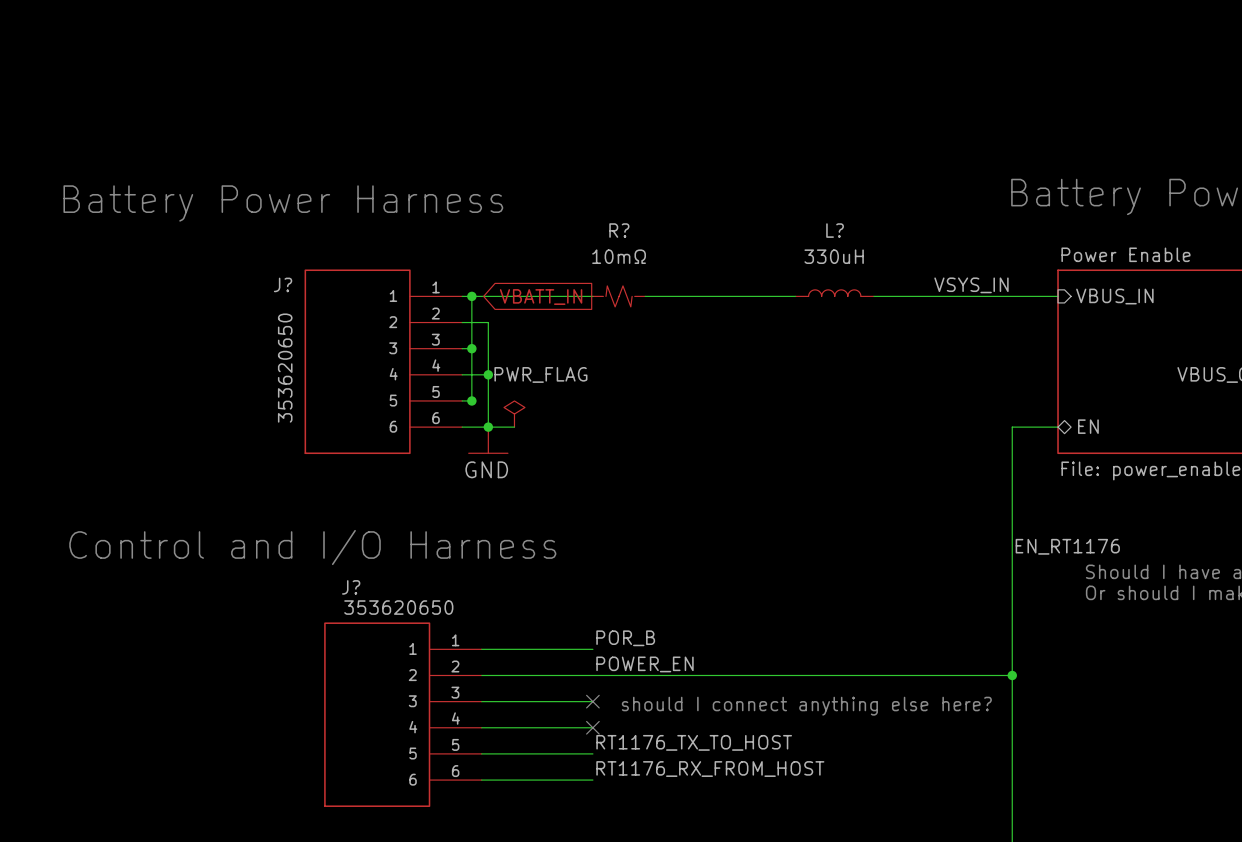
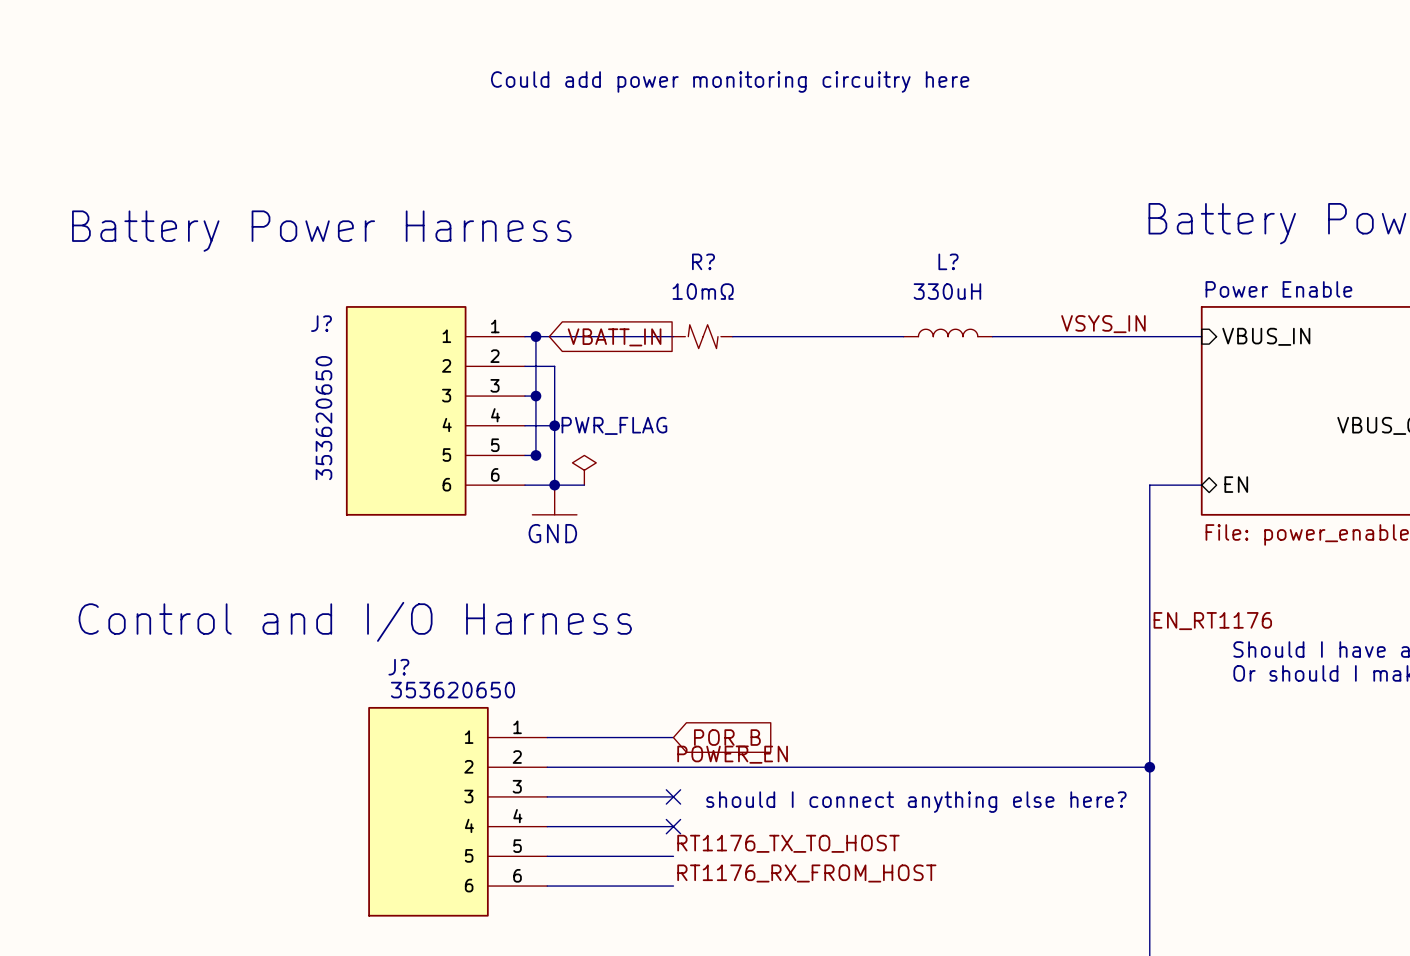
text: none -> Could add power monitoring circuitry here (730, 81)
label: POR_B (625, 638) -> none
global label: none -> POR_B (727, 738)

